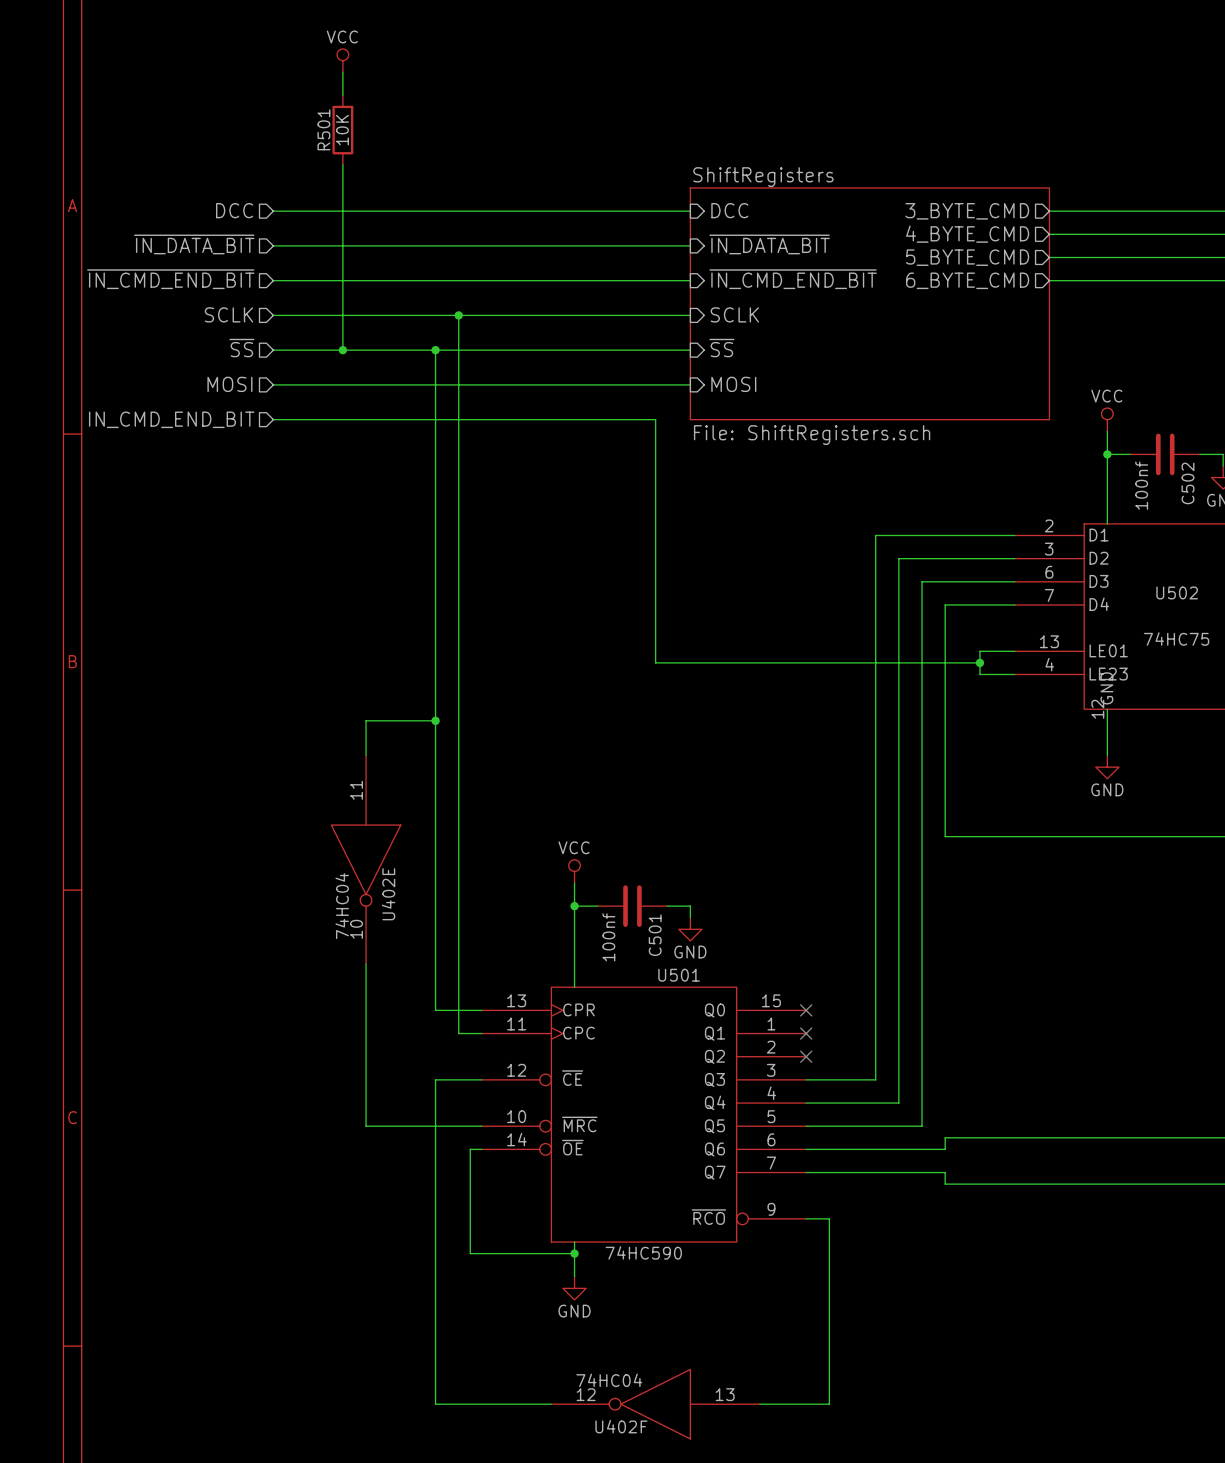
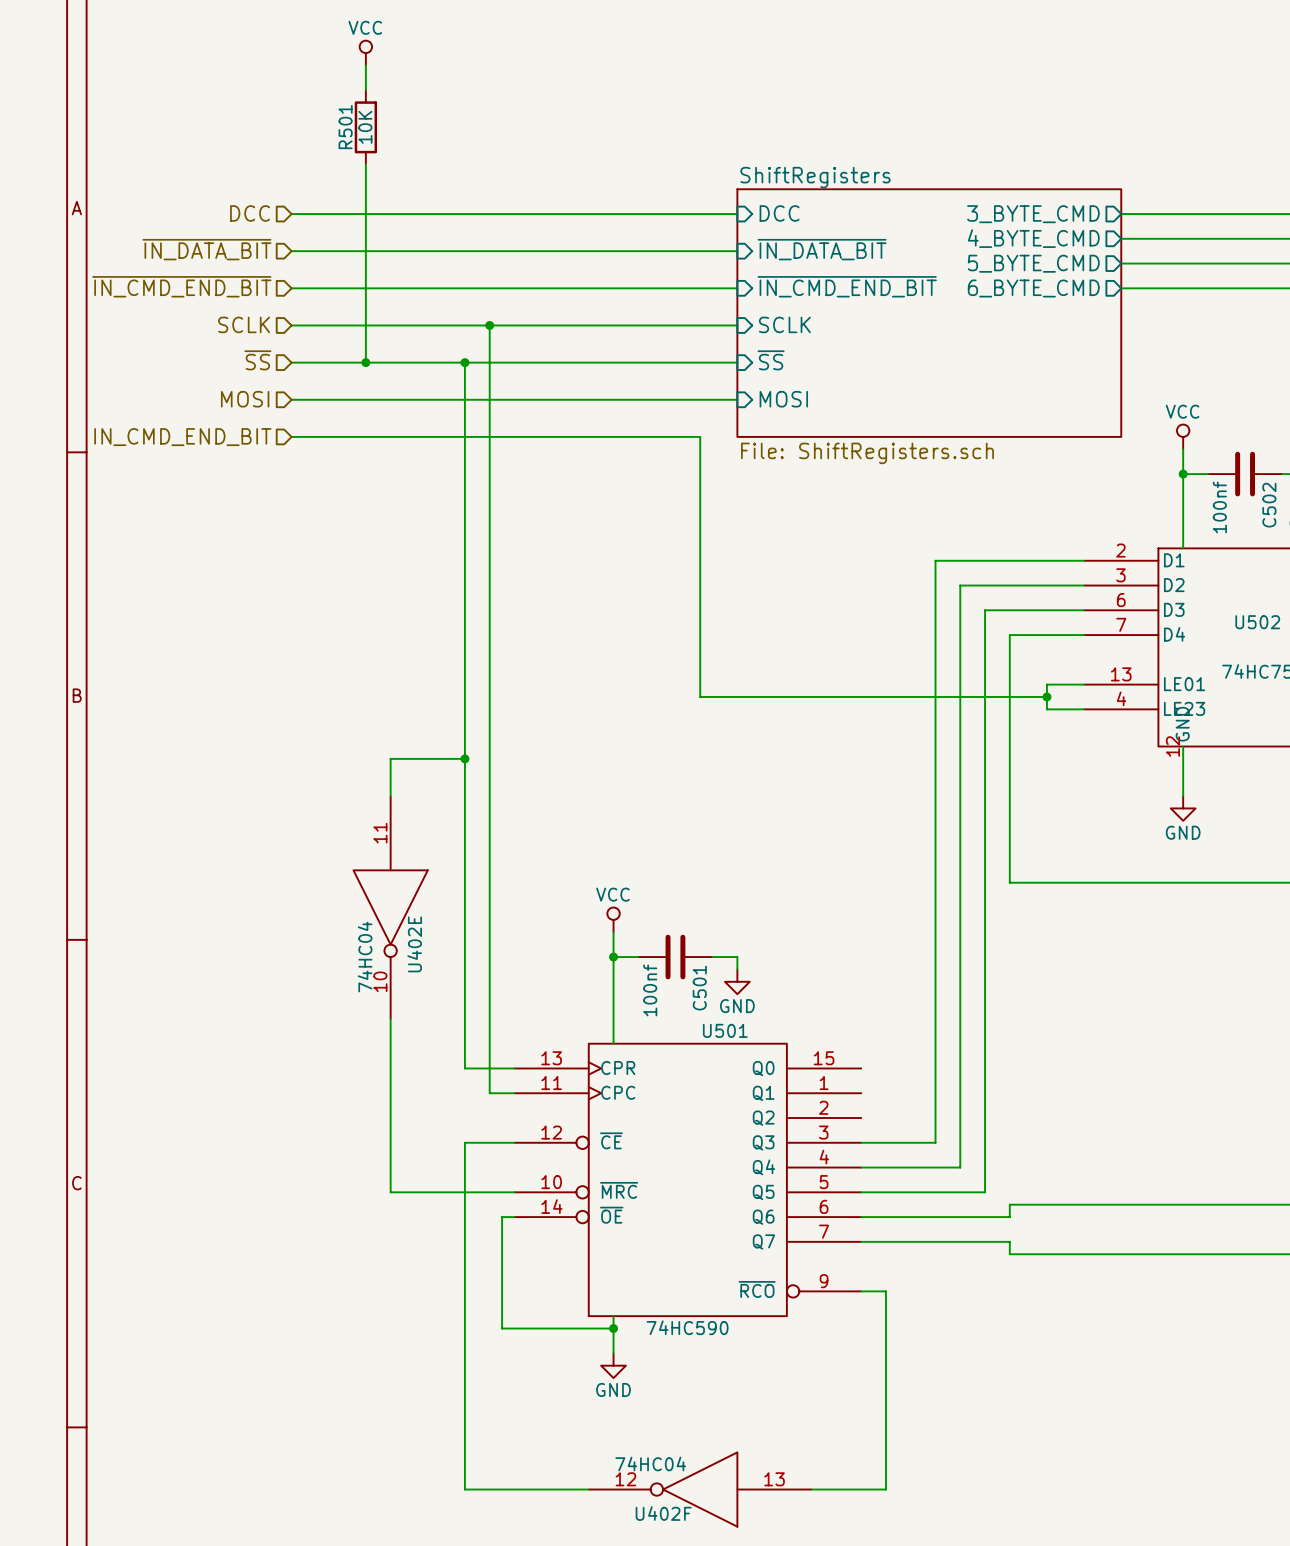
no-connect mark: (806, 1010) -> none
no-connect mark: (806, 1033) -> none
no-connect mark: (806, 1056) -> none

